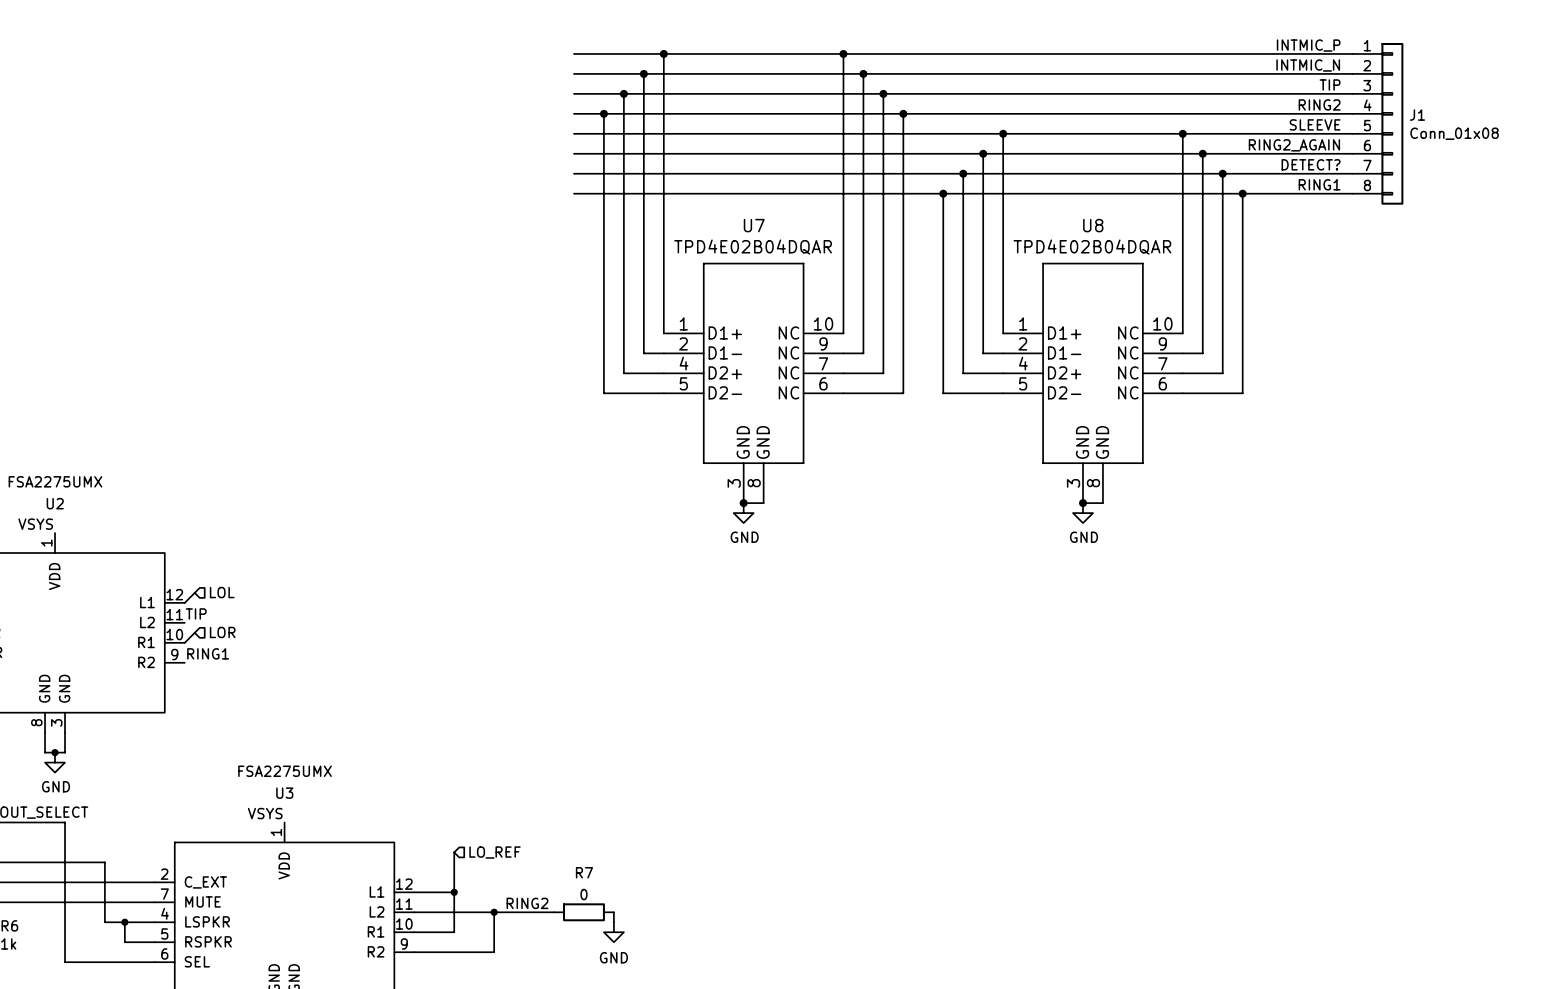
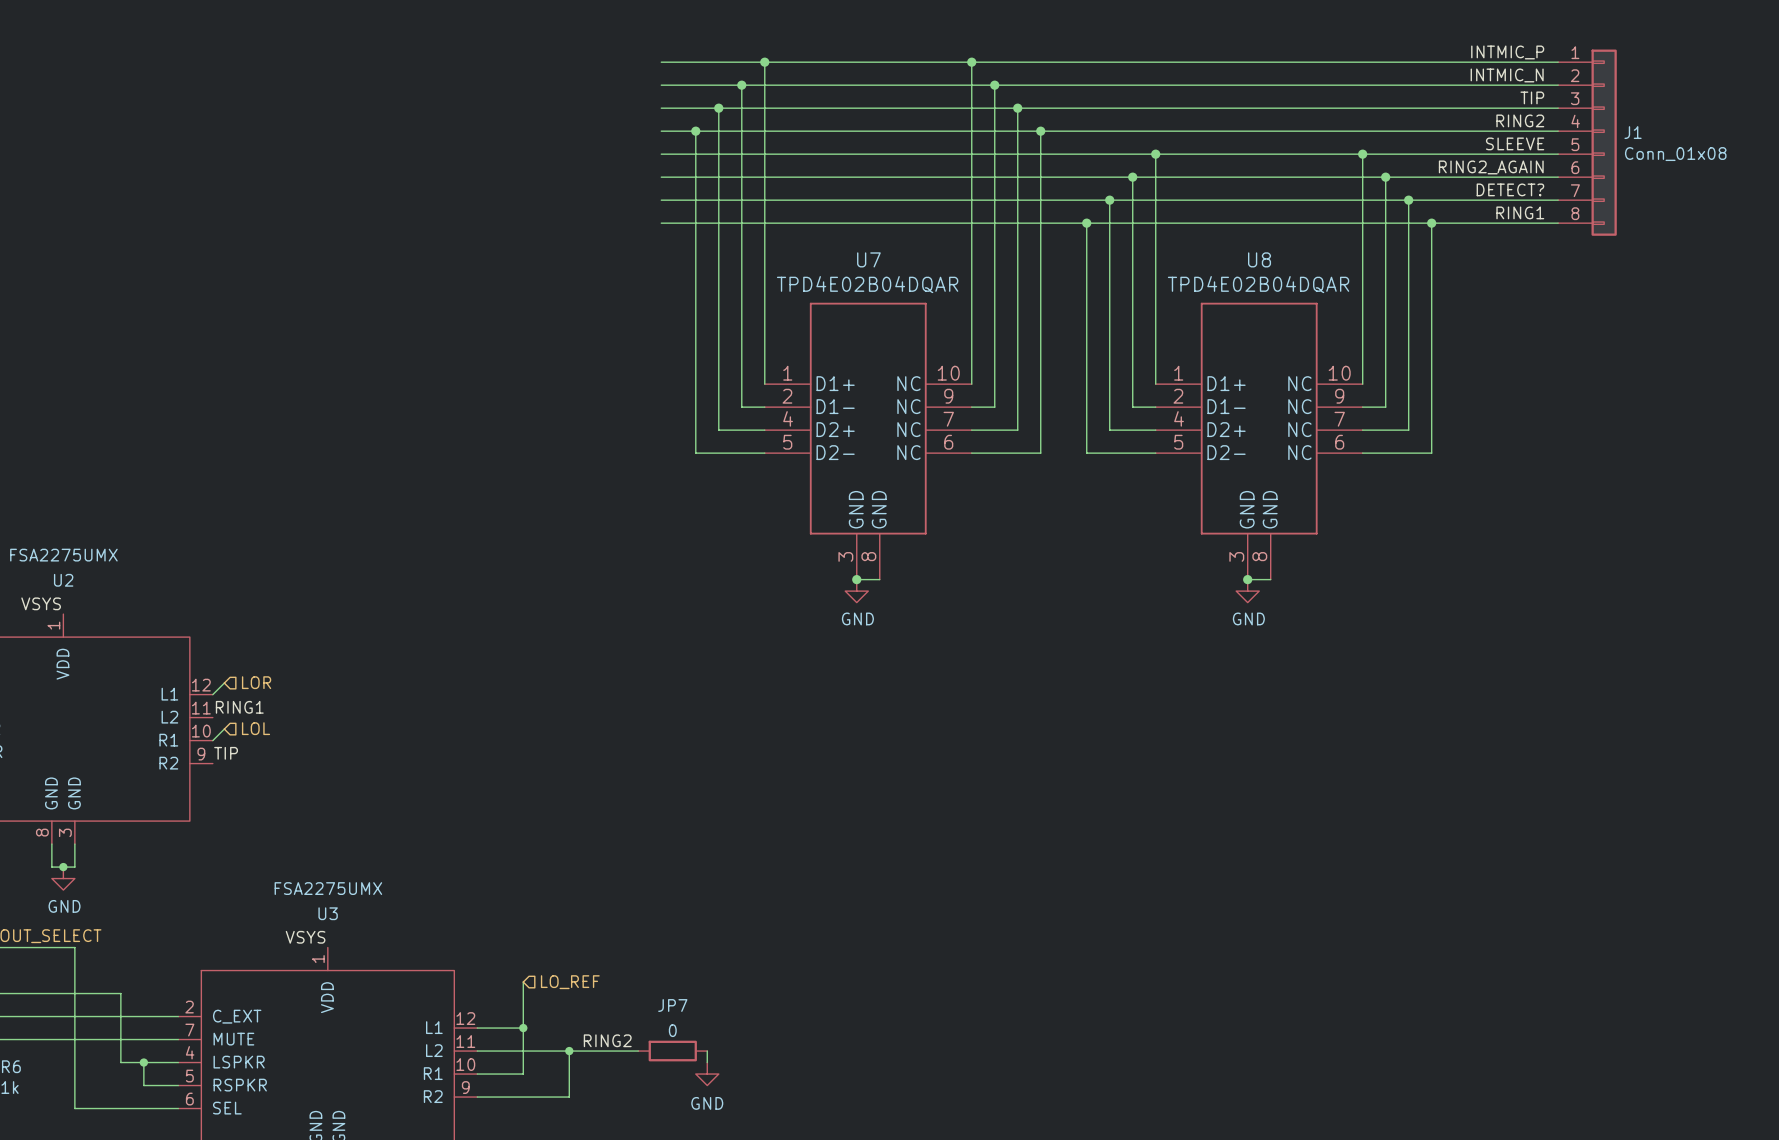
hierarchical label: LOL (222, 592) -> LOR (256, 682)
label: TIP (196, 613) -> RING1 (239, 707)
hierarchical label: LOR (222, 632) -> LOL (256, 728)
label: RING1 (208, 653) -> TIP (226, 753)
R7 name: R7 (584, 872) -> JP7 (672, 1005)

